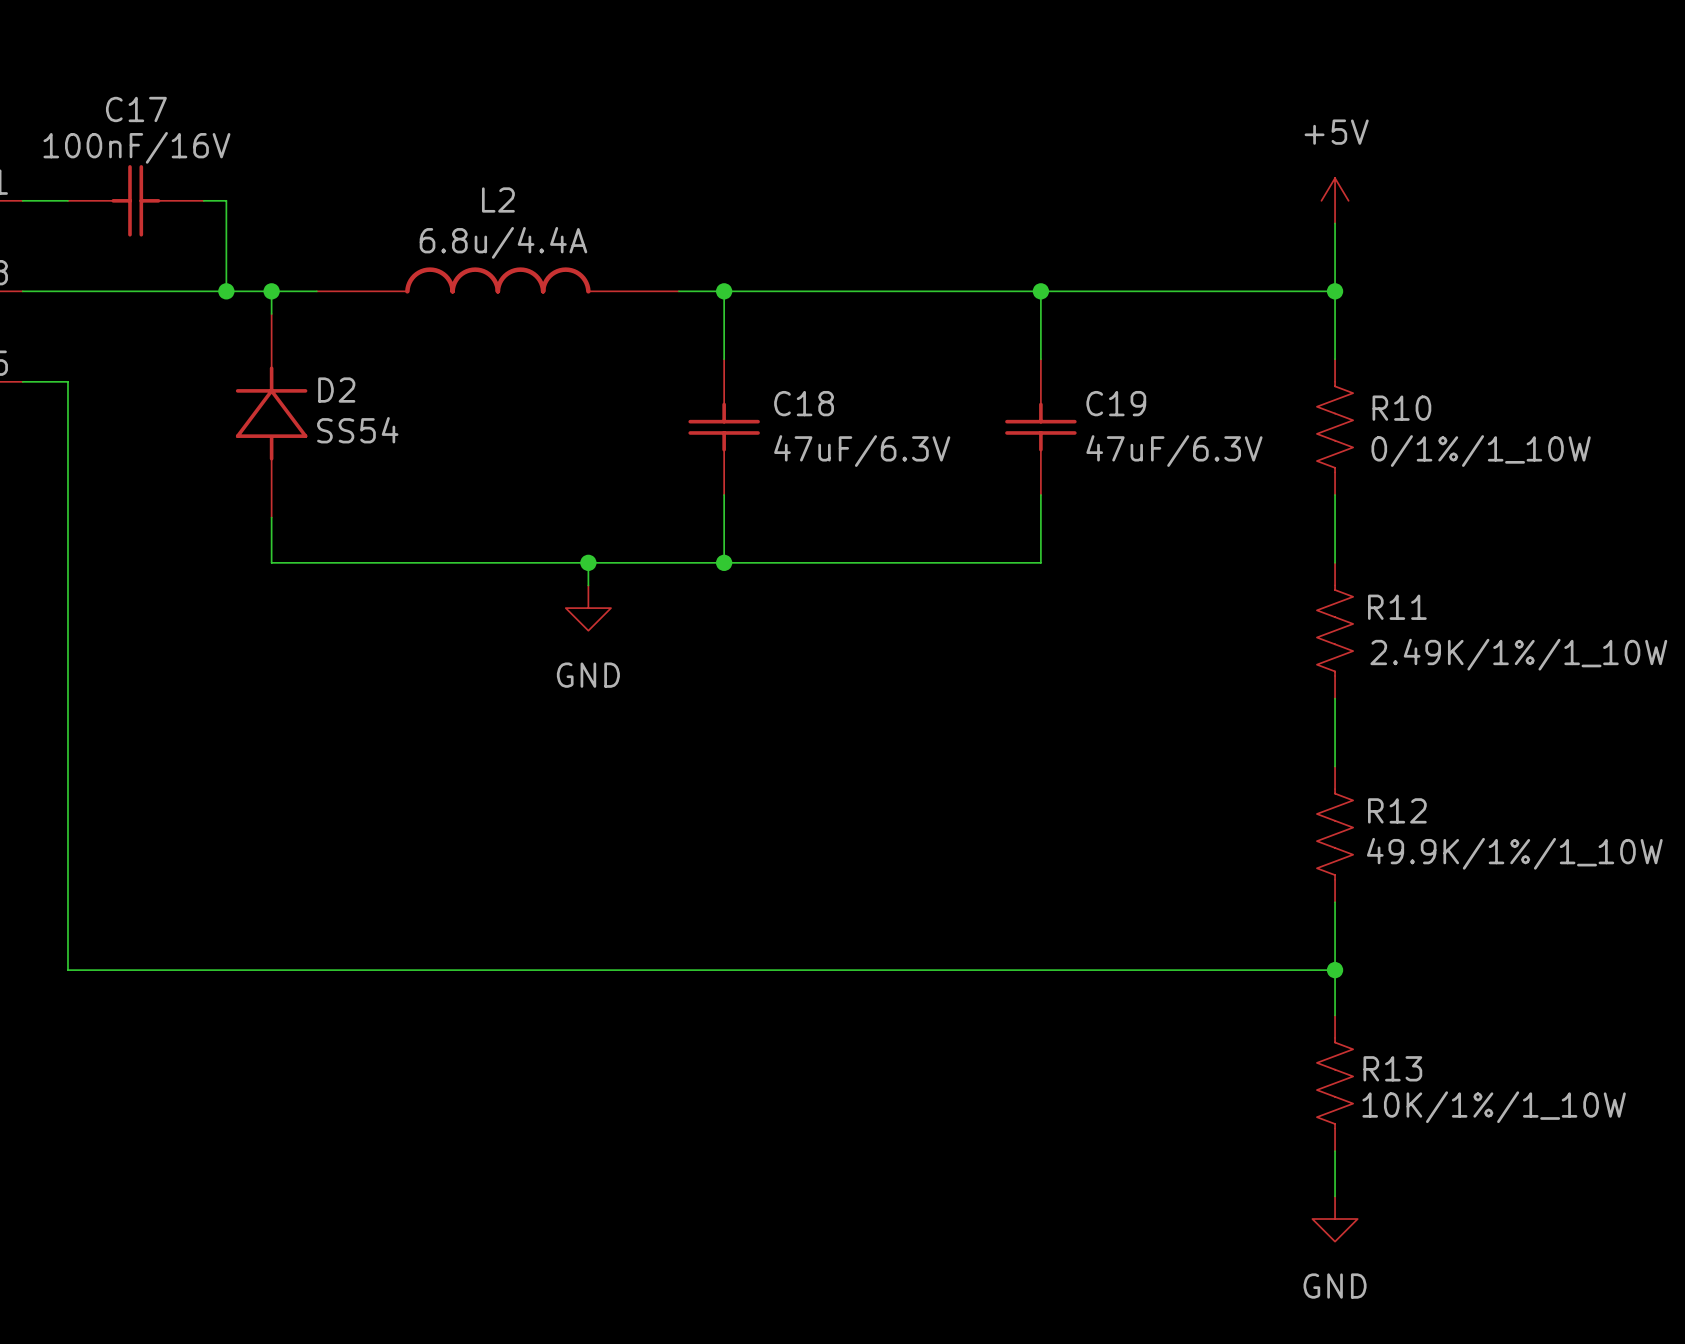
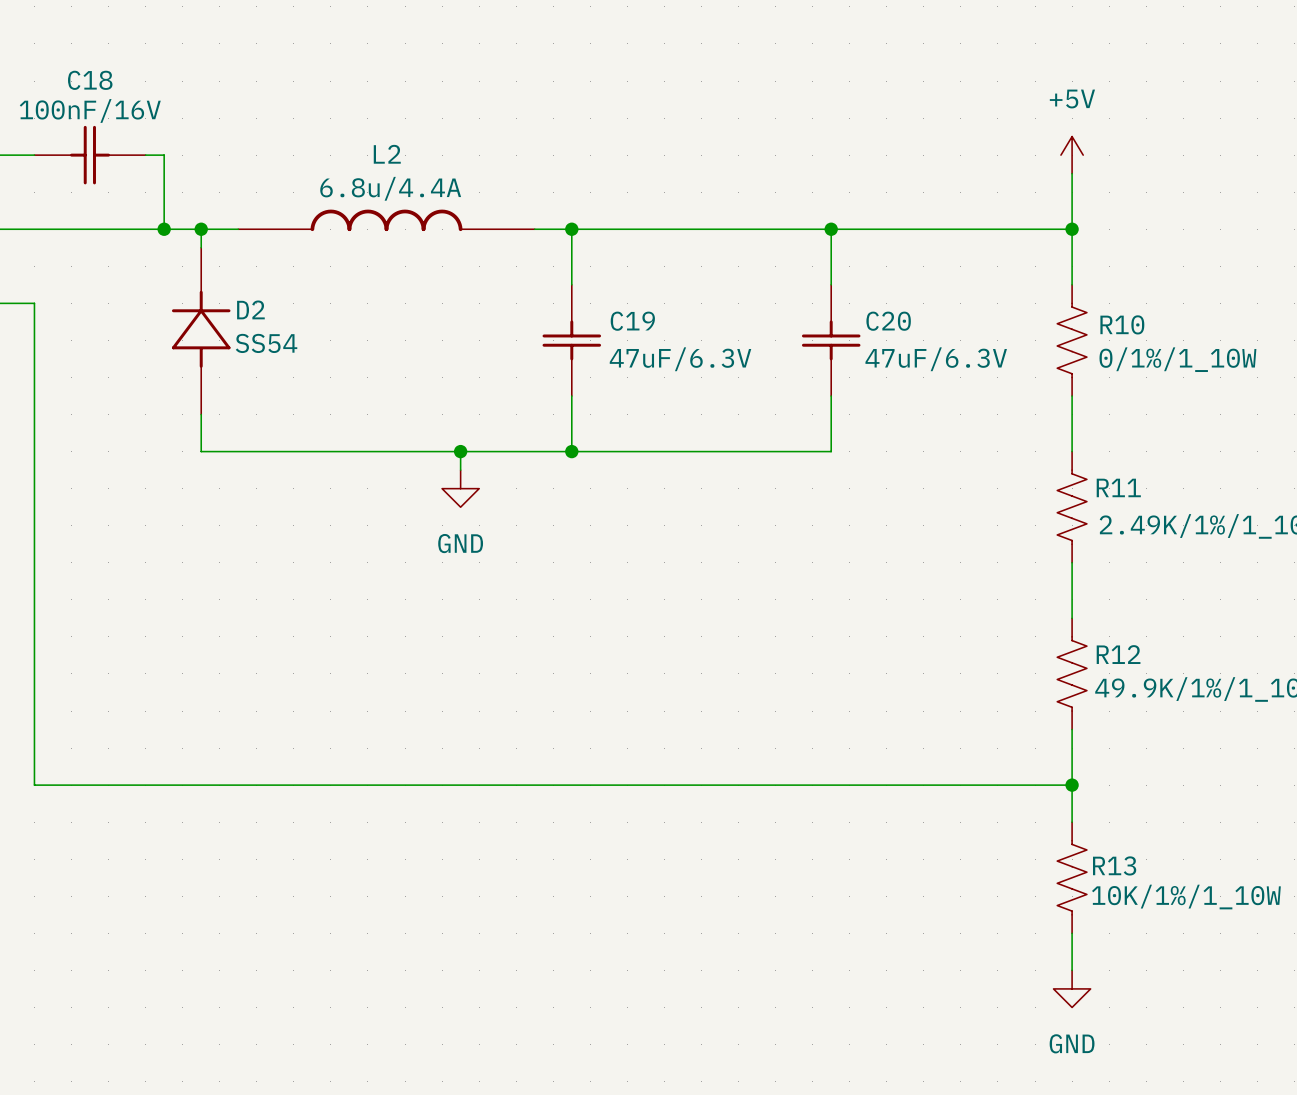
C17 name: C17 (136, 109) -> C18 (90, 80)
C18 name: C18 (804, 403) -> C19 (632, 321)
C19 name: C19 (1116, 403) -> C20 (888, 321)

